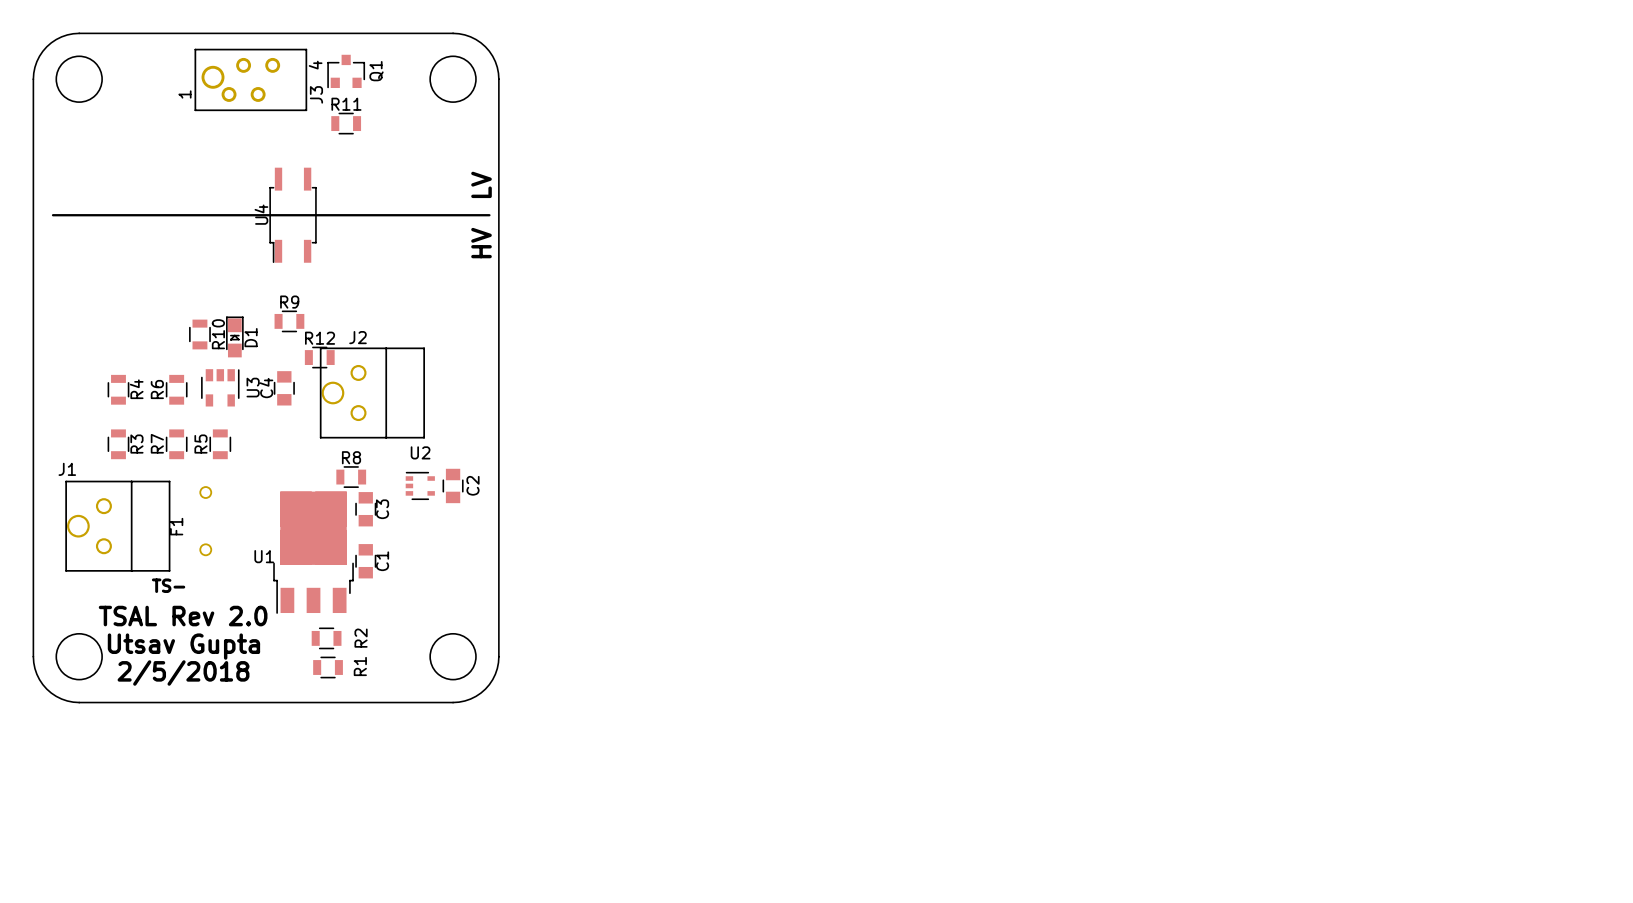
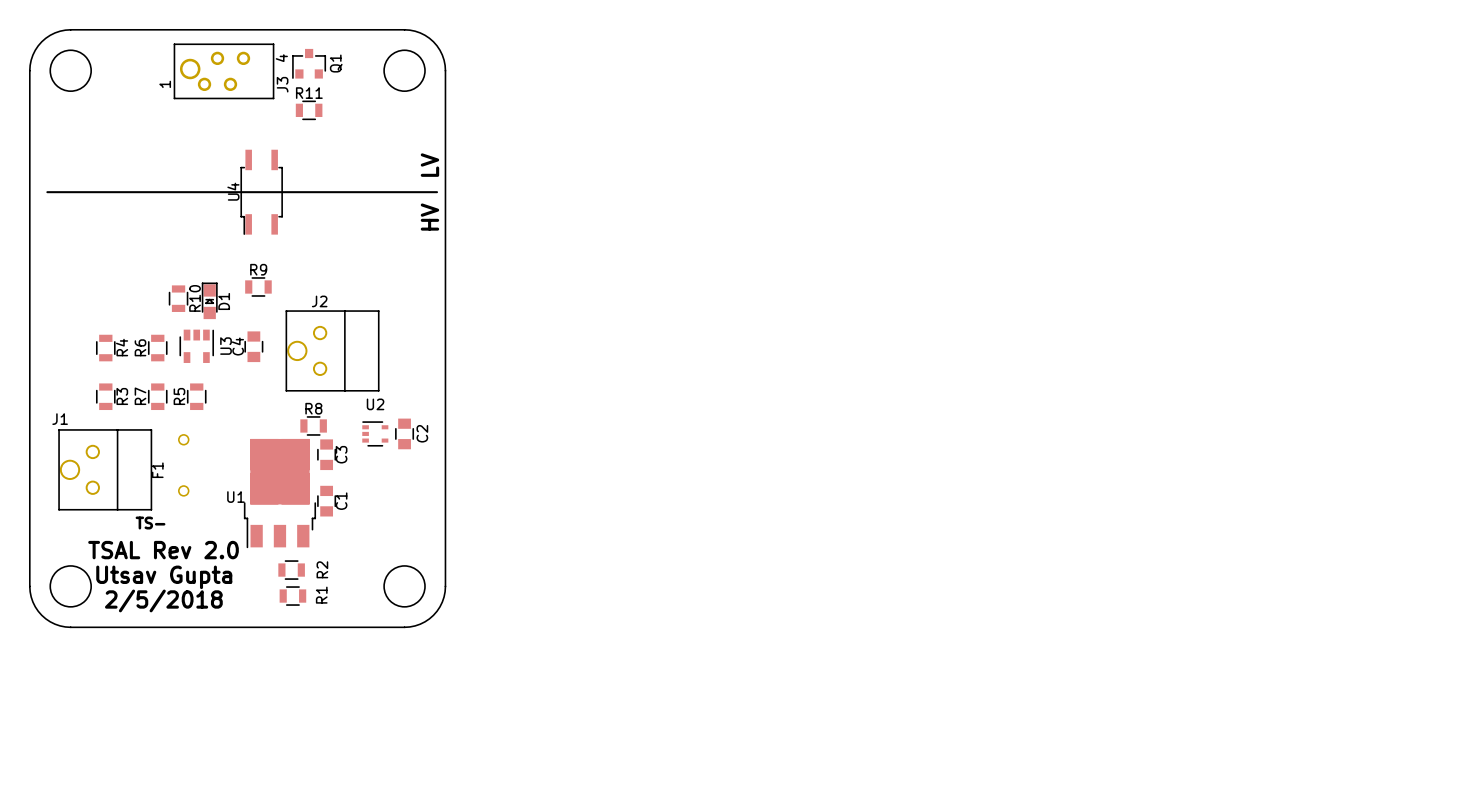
R12: (319, 357) -> none

